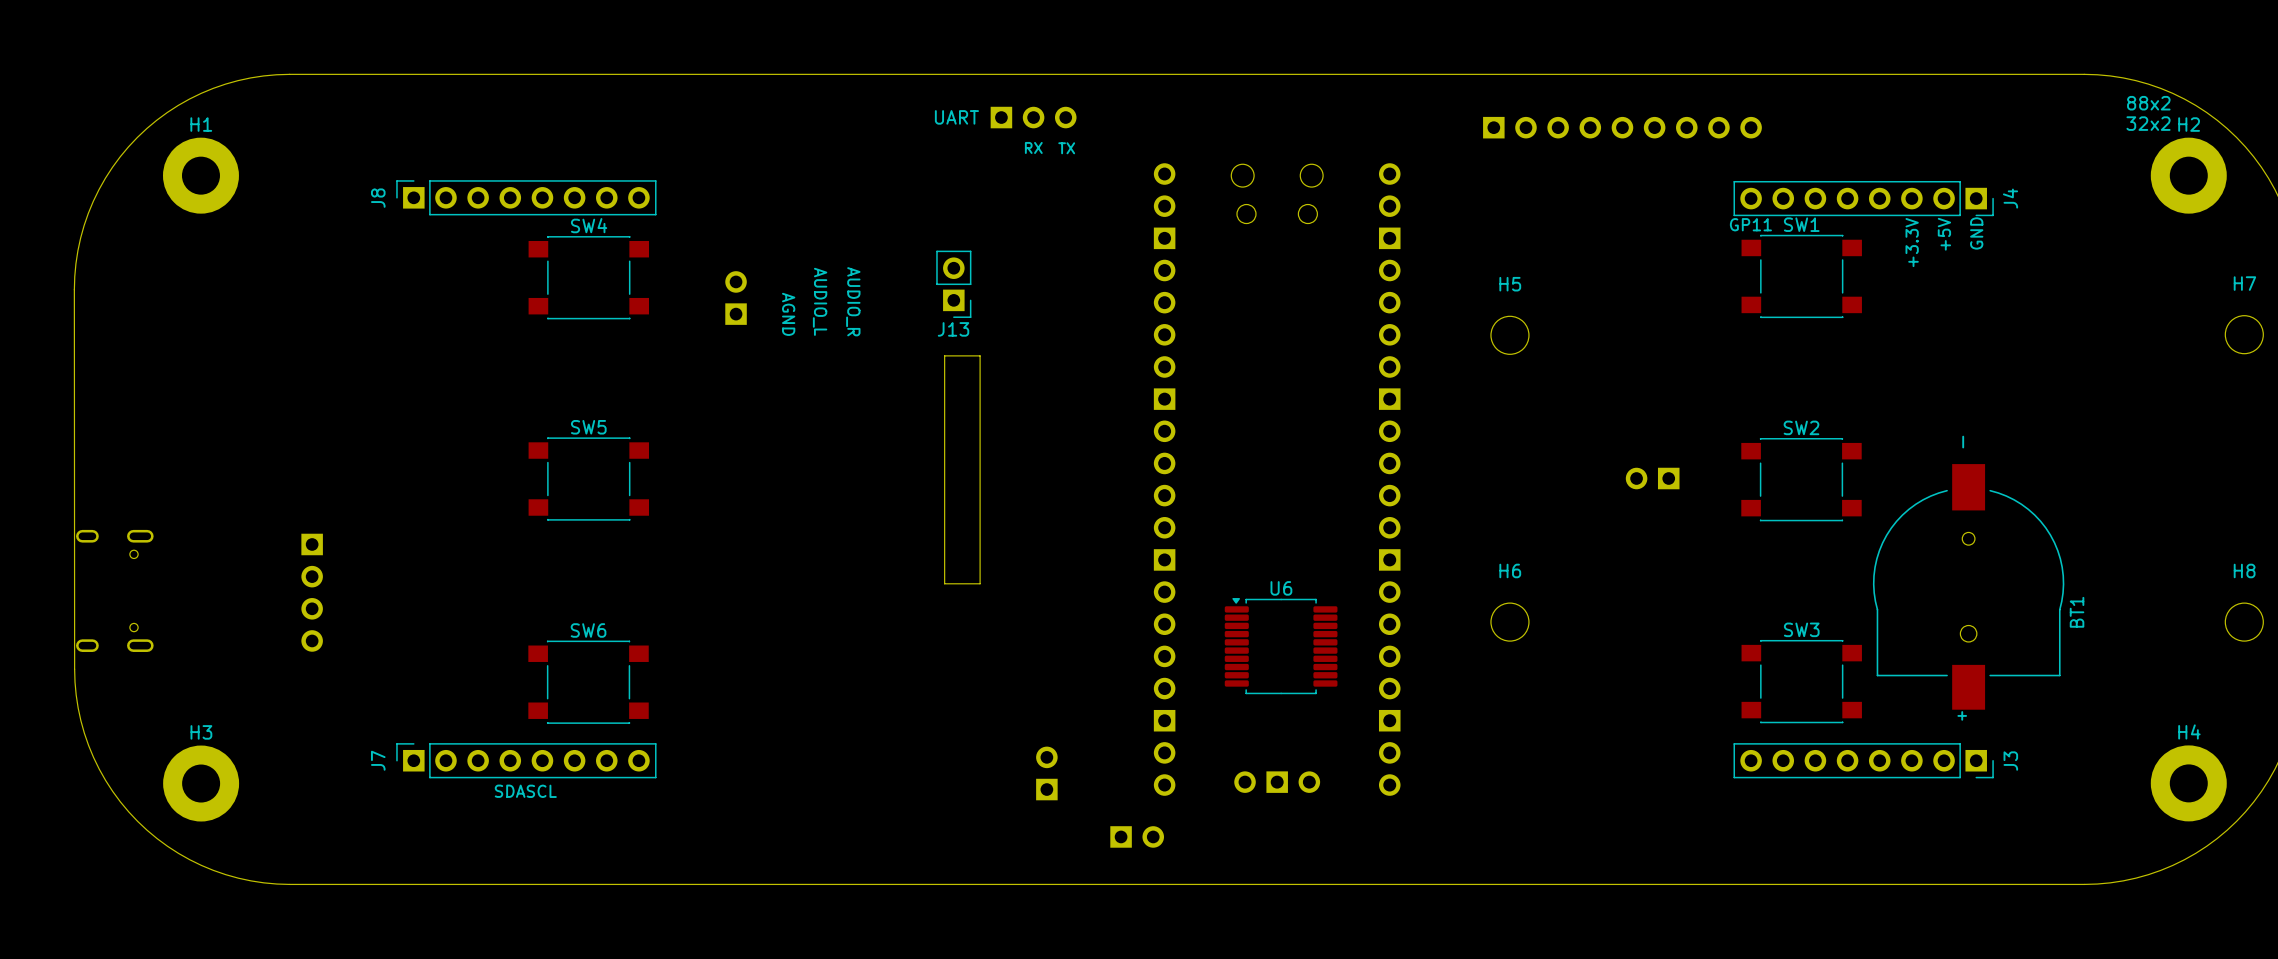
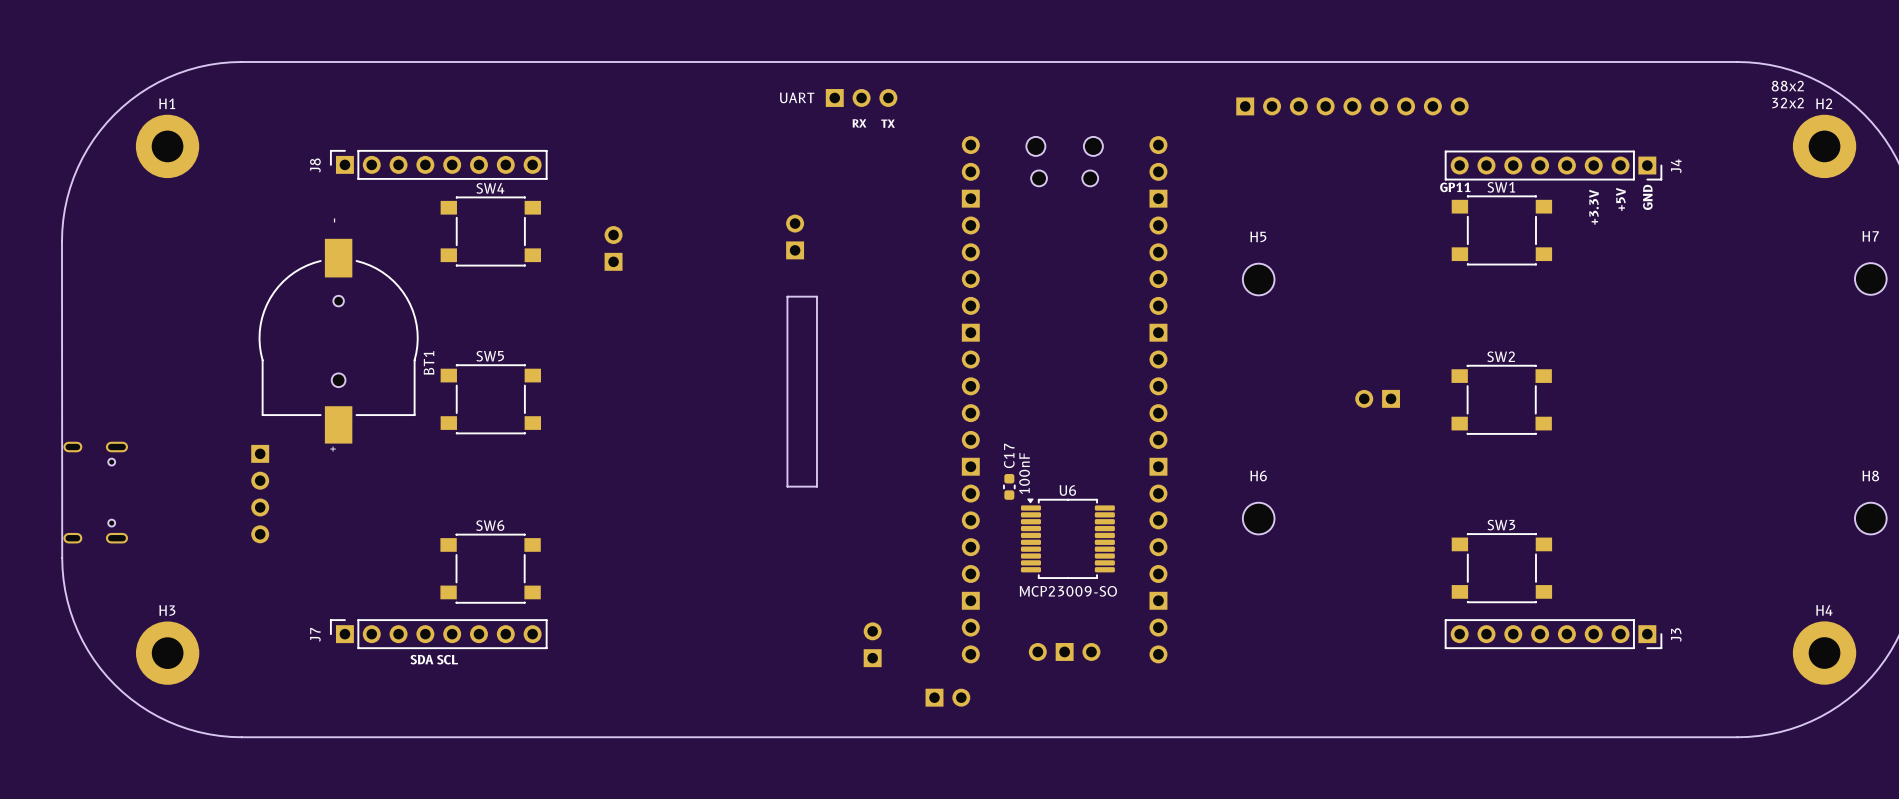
J13 side: top (953, 284) -> bottom (795, 236)
text: AUDIO_L (820, 301) -> none
text: AUDIO_R (853, 301) -> none
text: AGND (788, 314) -> none
C17: none -> 100nF (1009, 486)
BT1 position: (1968, 586) -> (338, 341)
U6 value: none -> MCP23009-SO (1068, 591)

